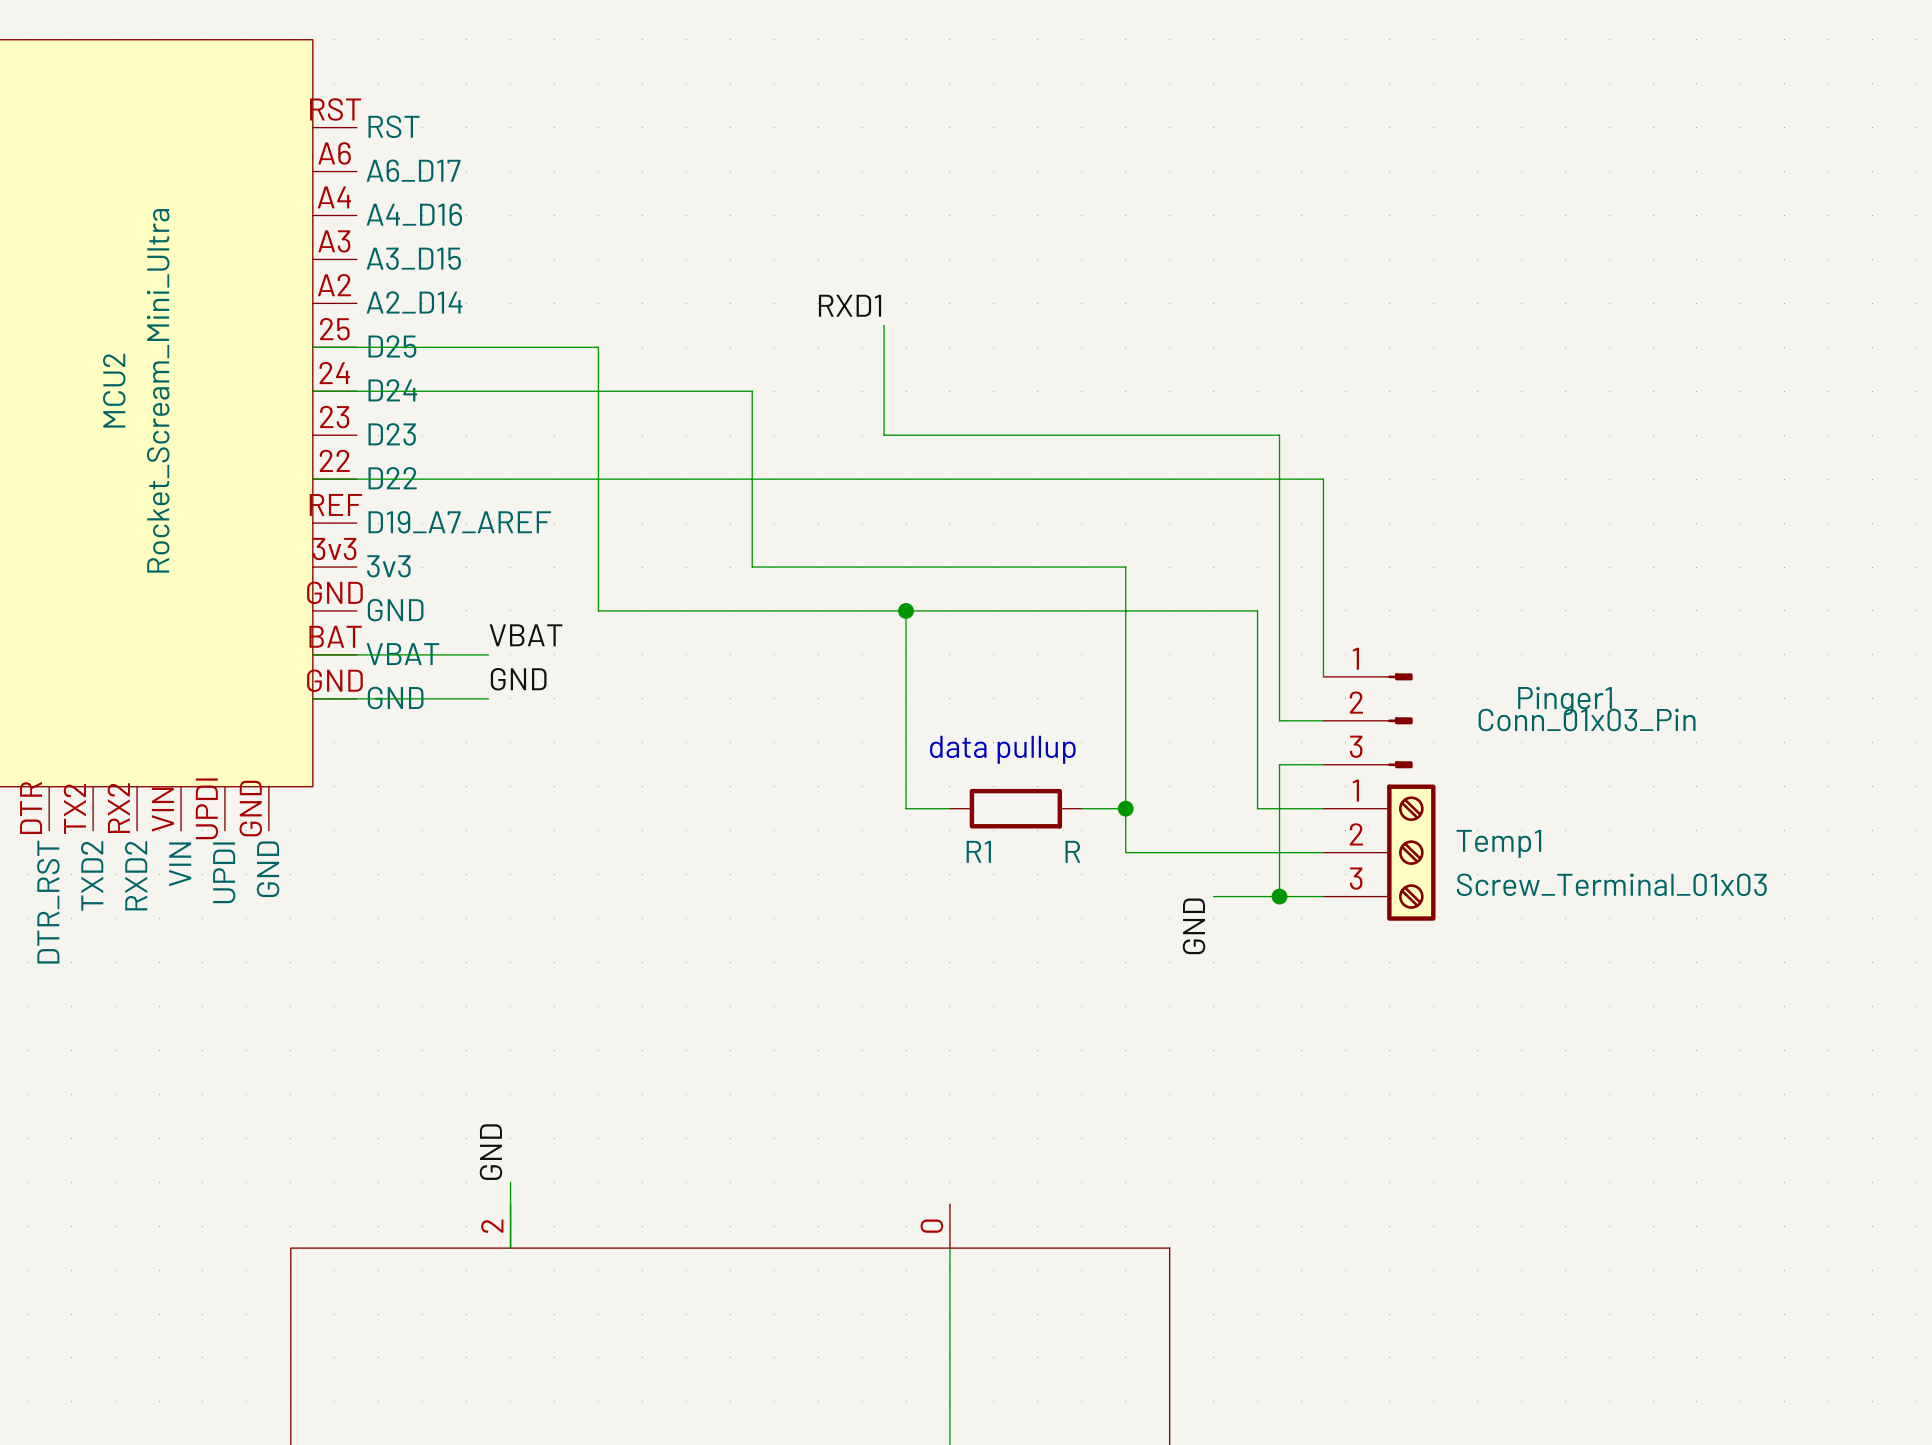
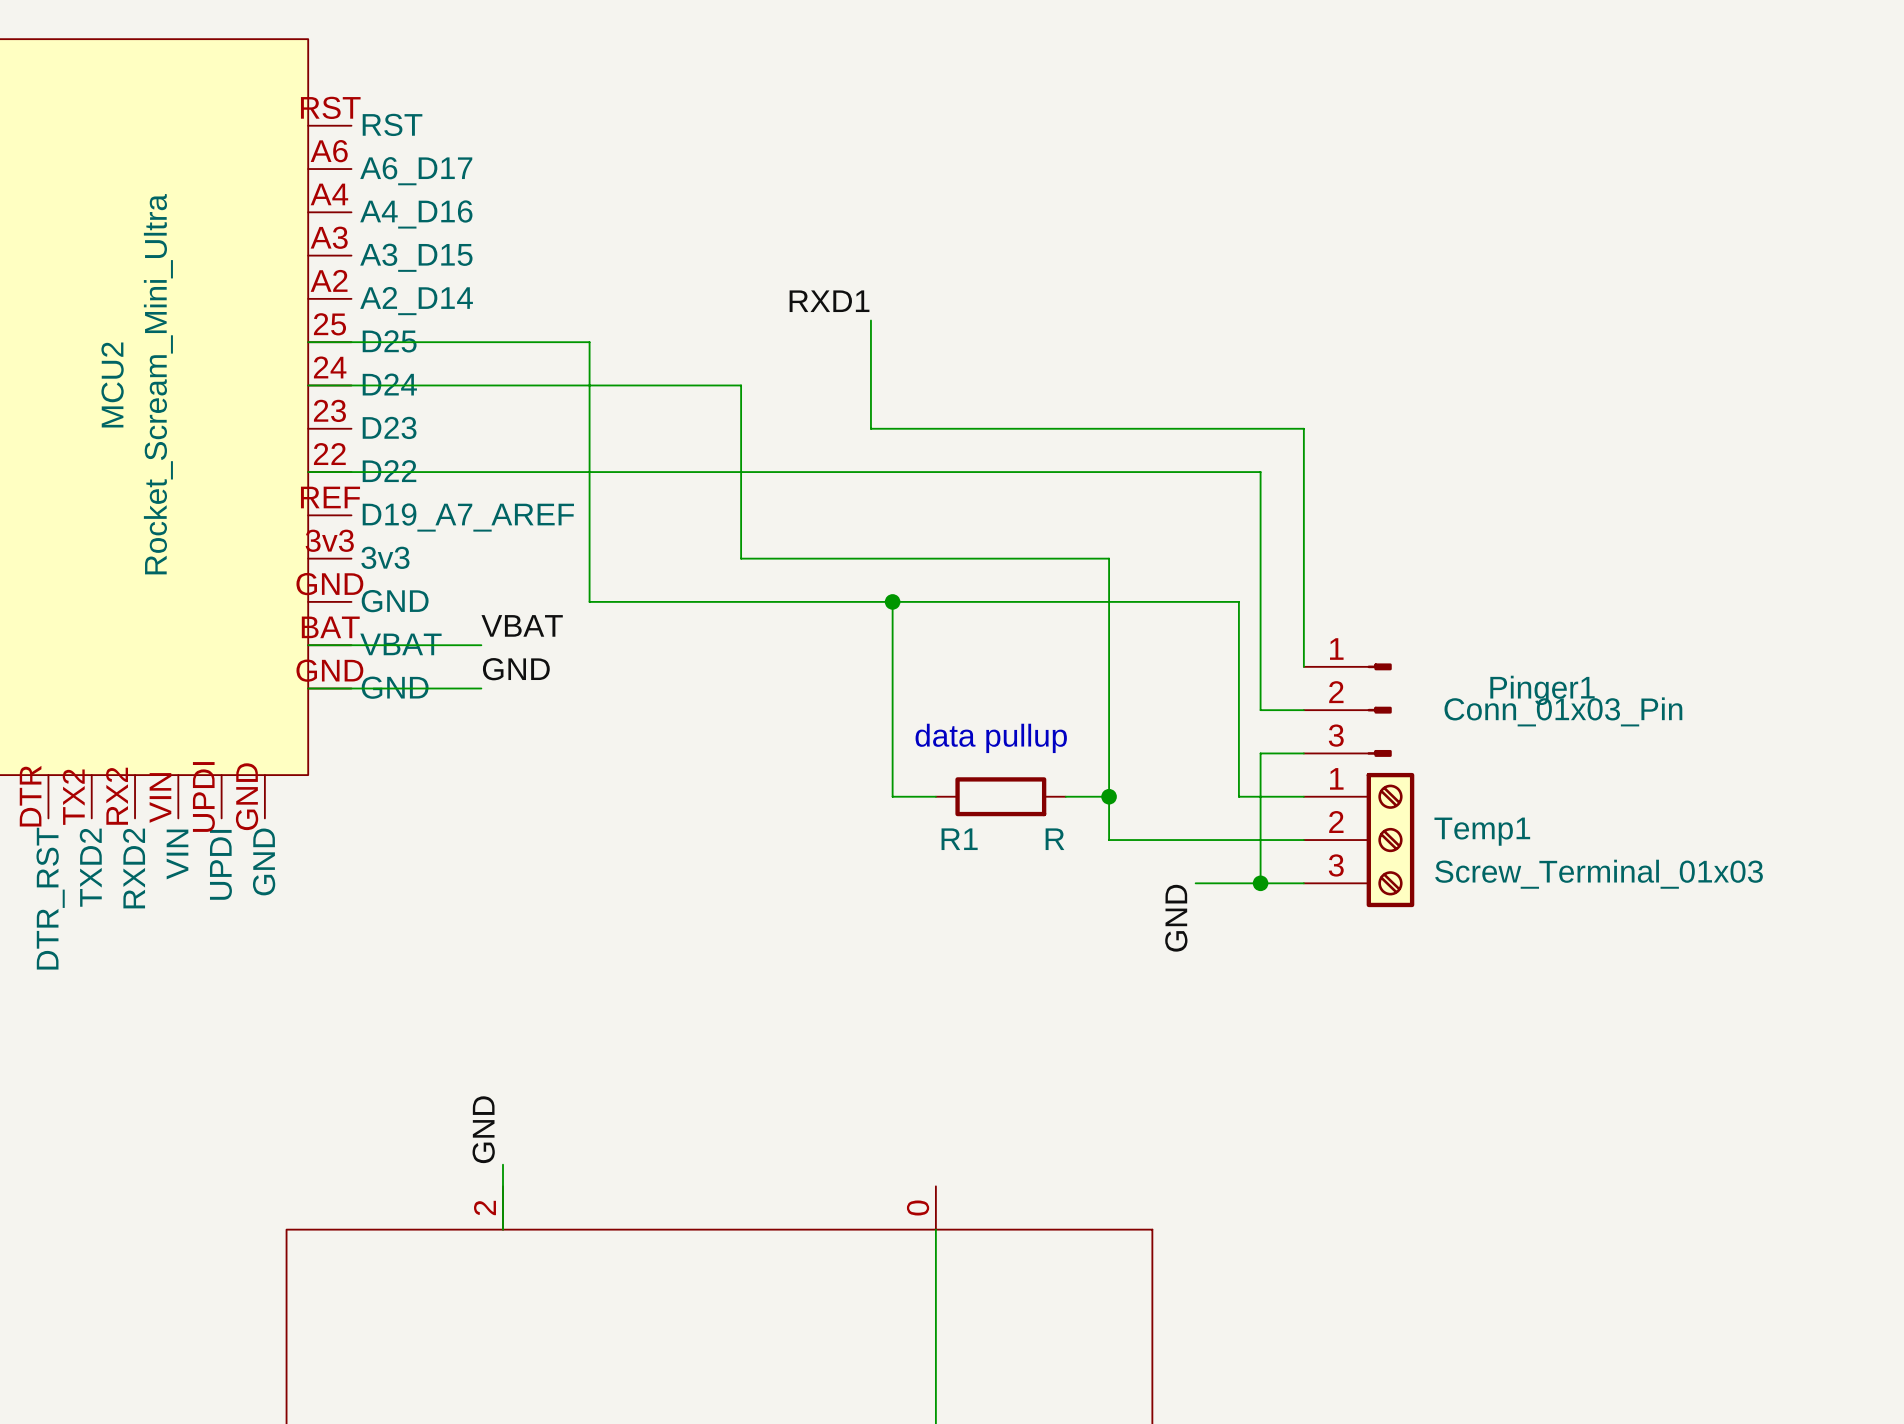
wire: (1279, 435) (1279, 479) (1323, 479) -> (1260, 428) (1303, 428) (1303, 472)

